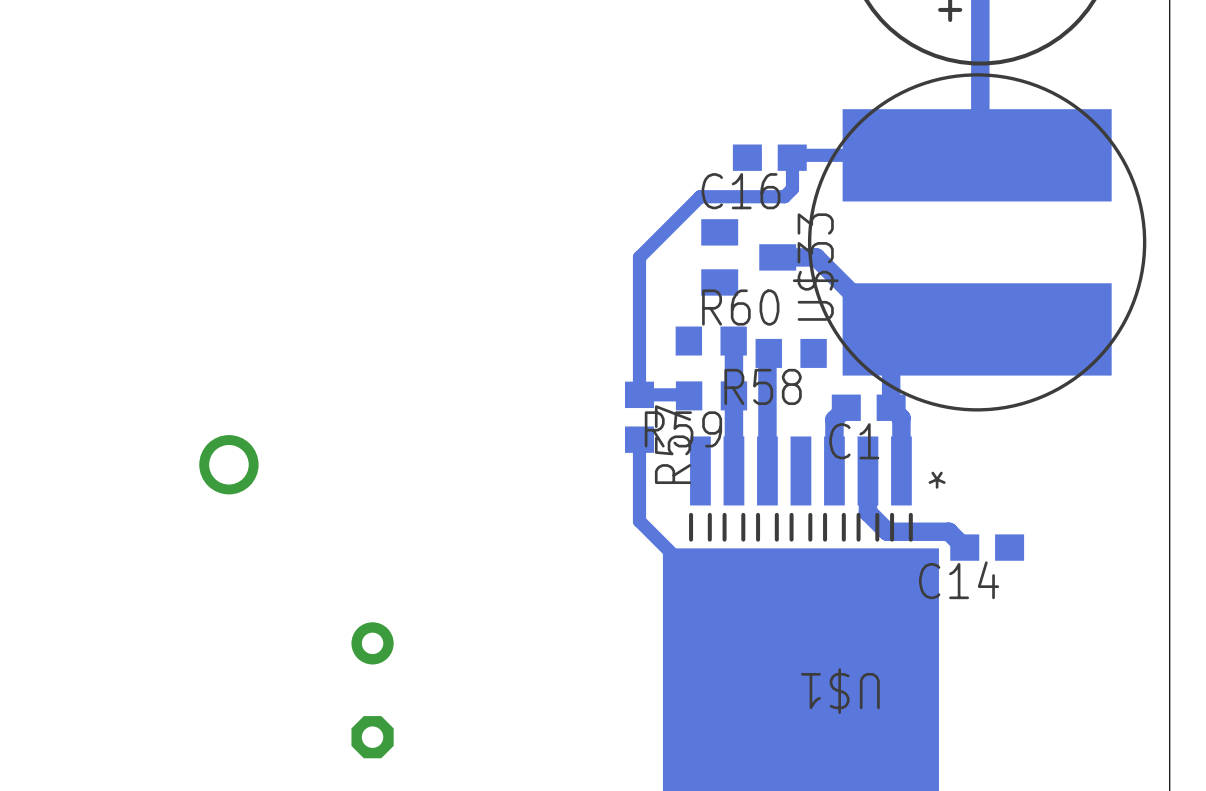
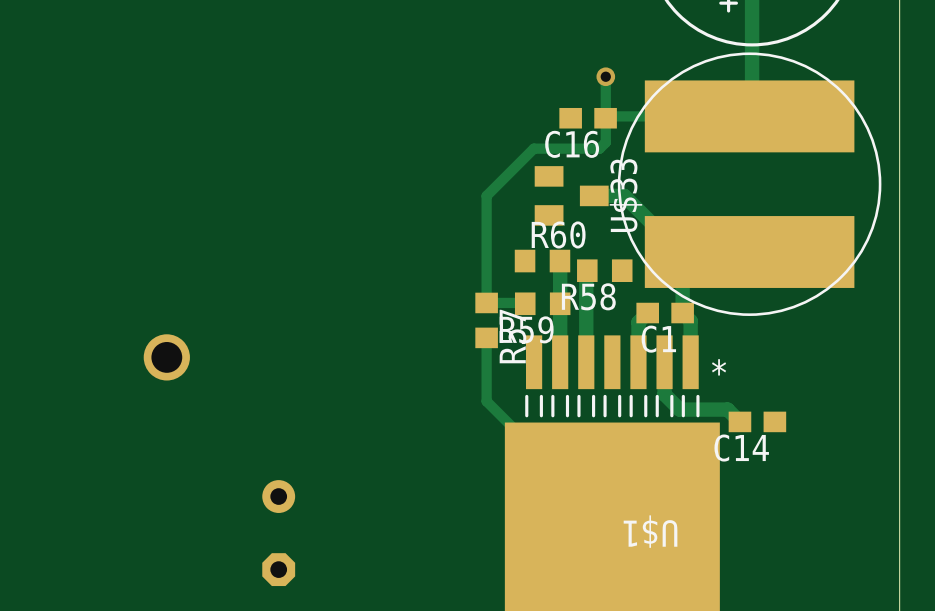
track: none -> (605, 76) (605, 118)
via: none -> (605, 76)

